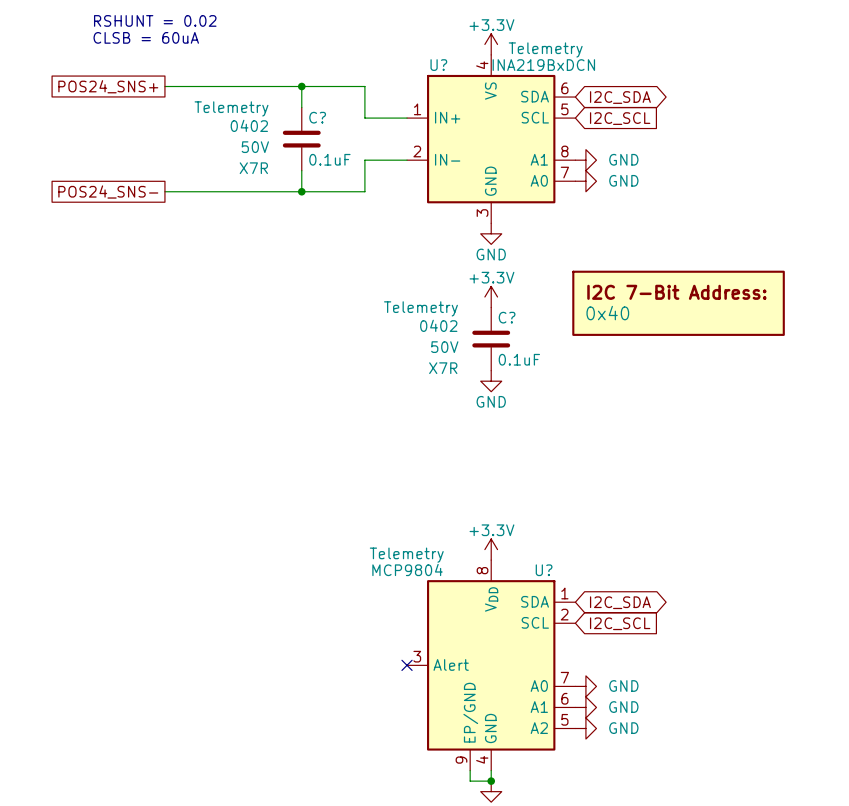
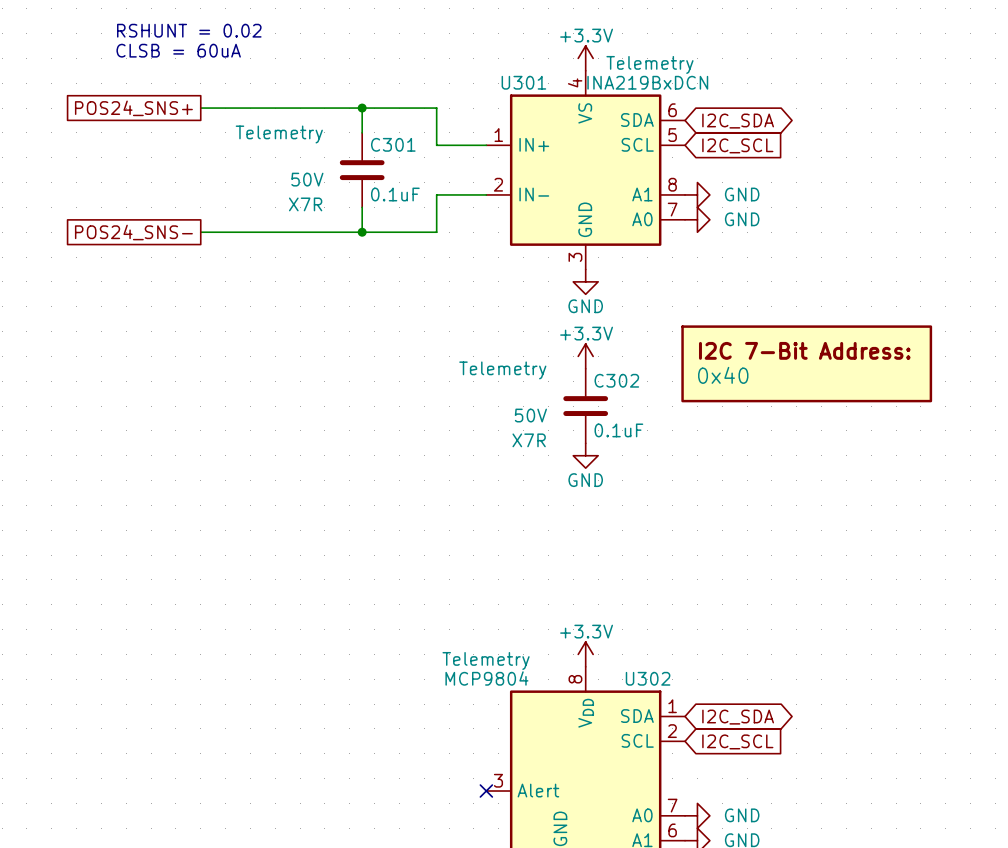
U? name: U? (438, 65) -> U301 (523, 82)
C? name: C? (317, 117) -> C301 (393, 144)
C? text: 0402 (249, 125) -> none
C? name: C? (507, 317) -> C302 (616, 380)
C? text: 0402 (438, 325) -> none
U? name: U? (544, 570) -> U302 (648, 678)

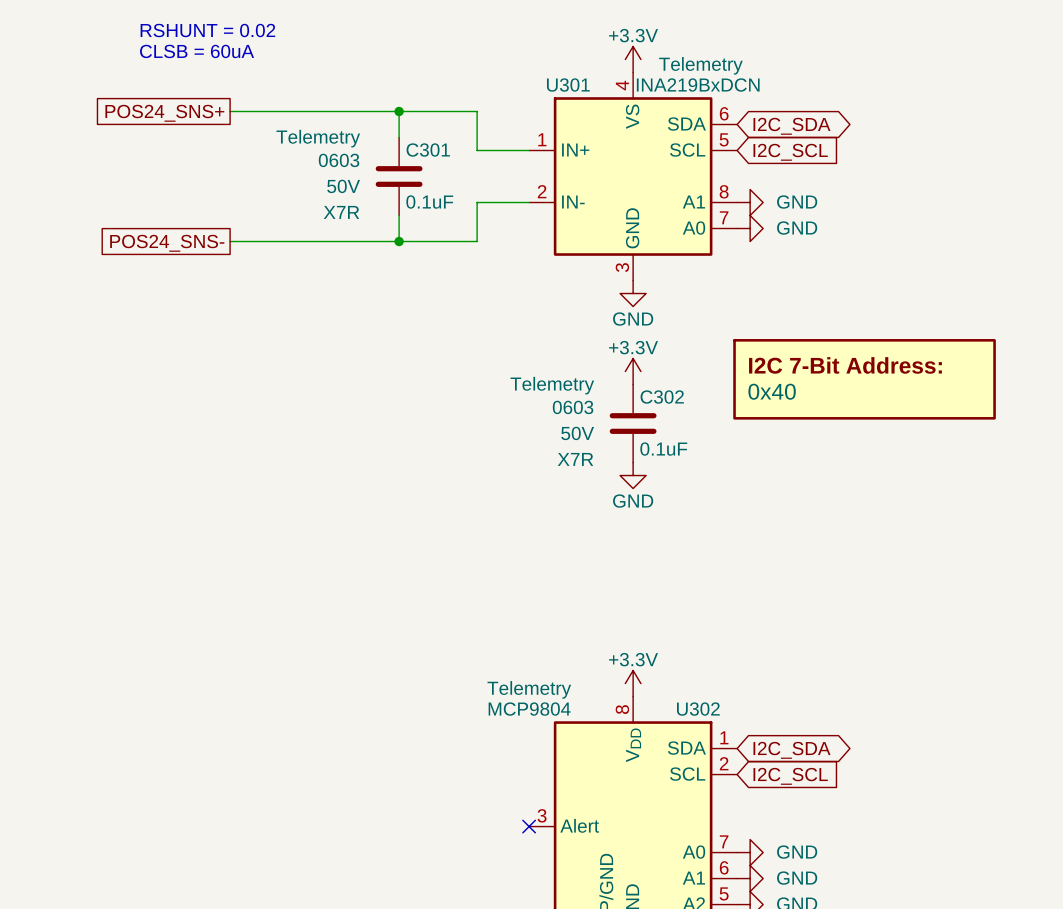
C301 text: none -> 0603 (339, 160)
C302 text: none -> 0603 (573, 407)

